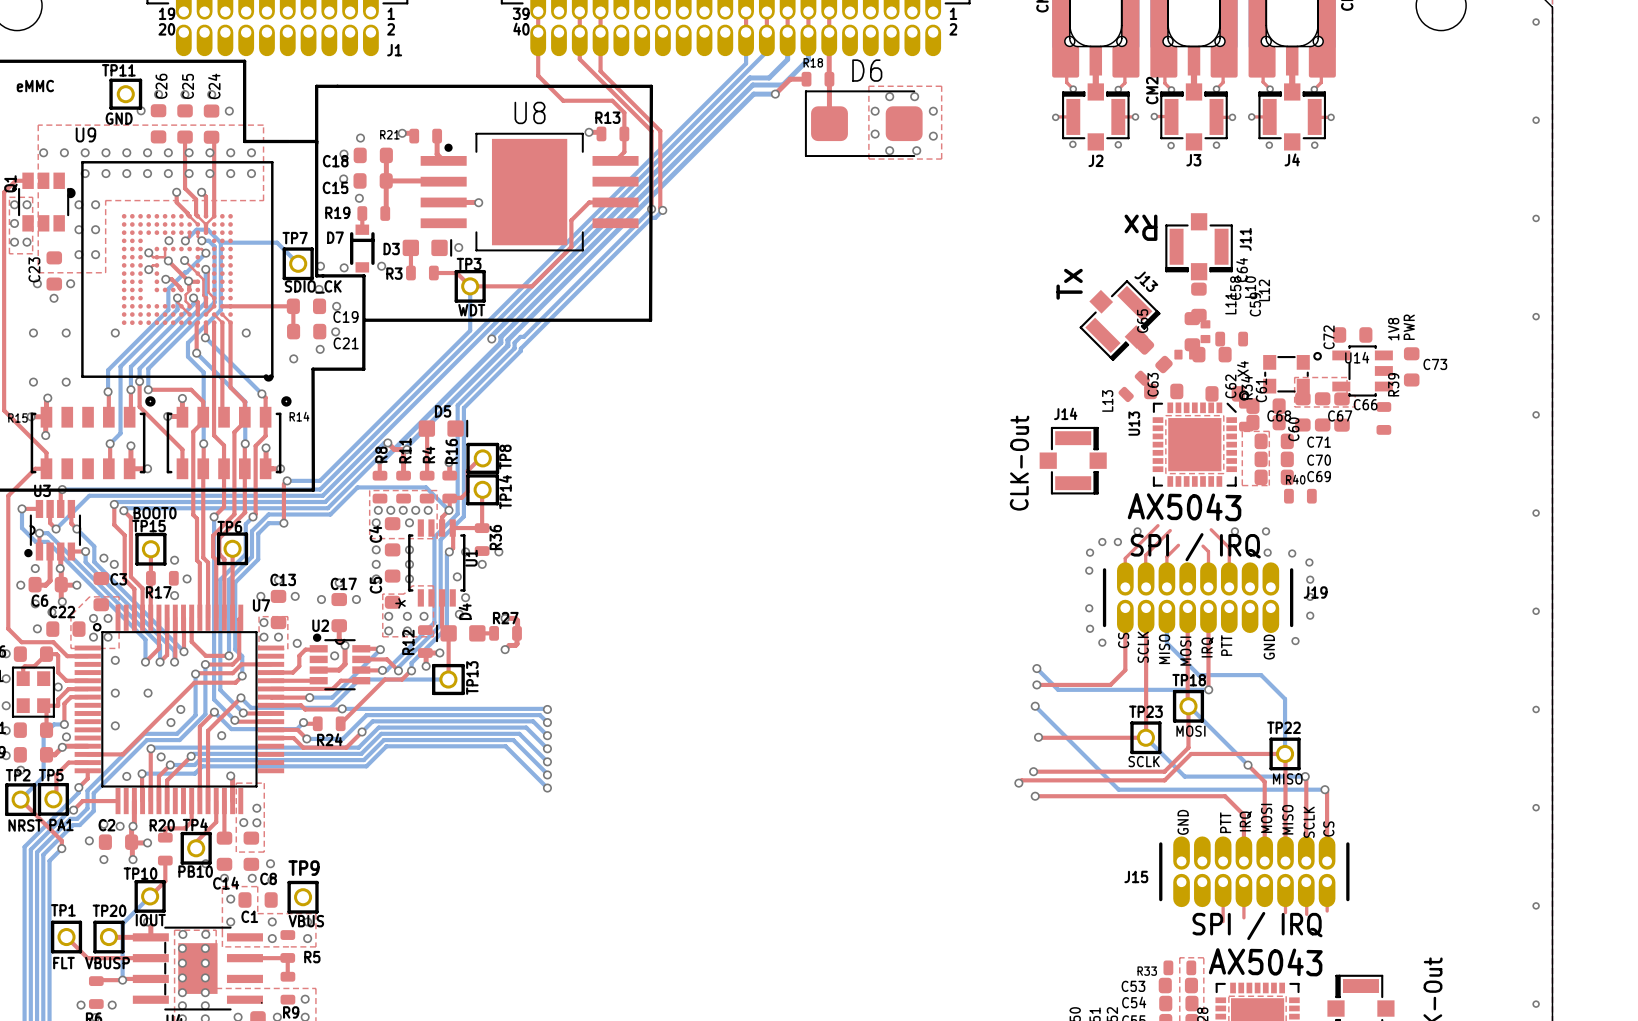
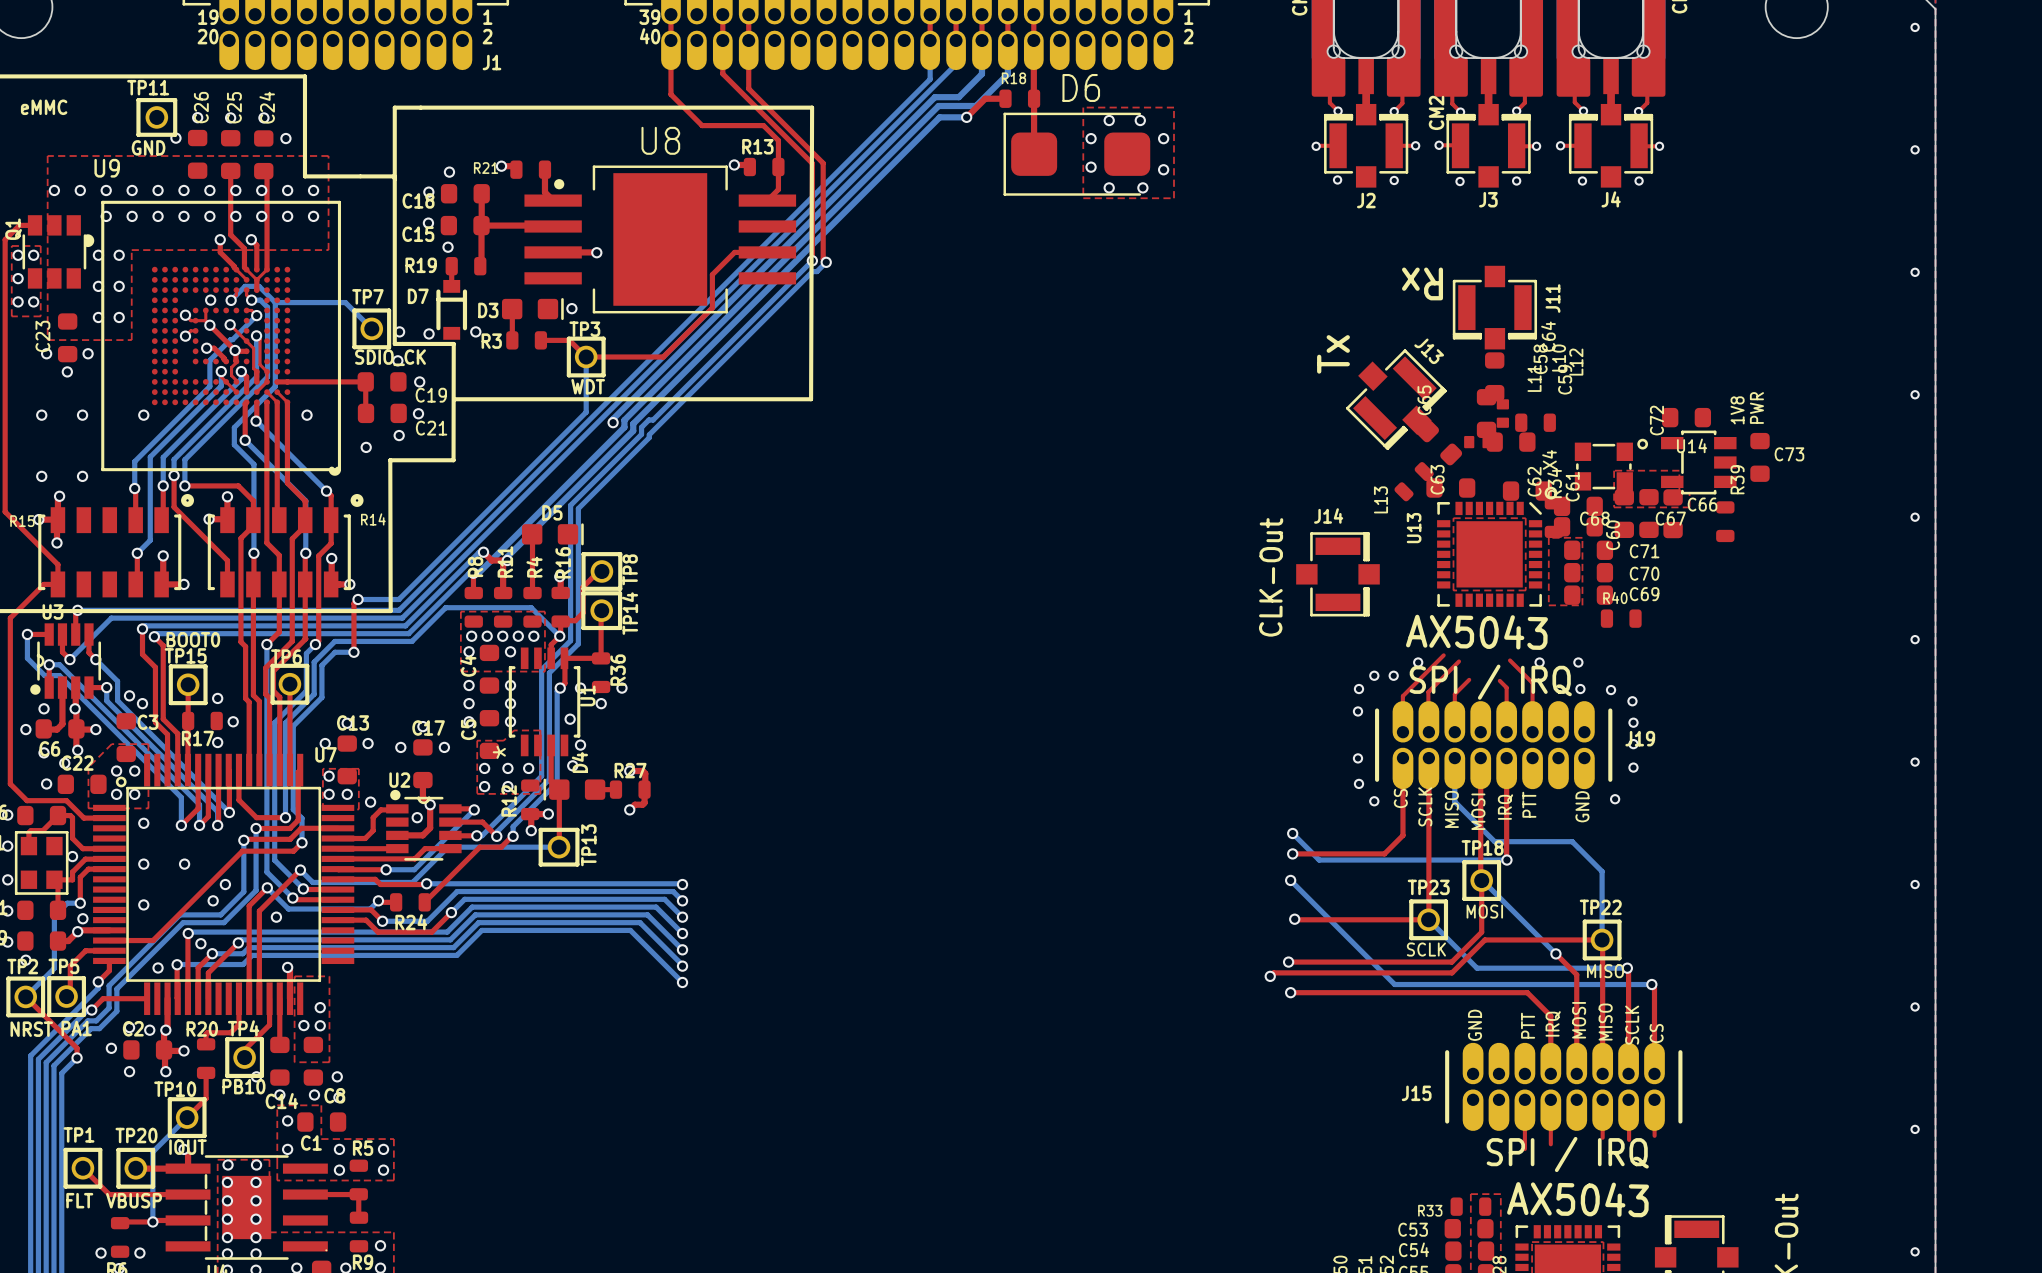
TP9: (303, 897) -> none
text: VBUS (306, 921) -> none
R5 name position: R5 (312, 957) -> R5 (363, 1148)

